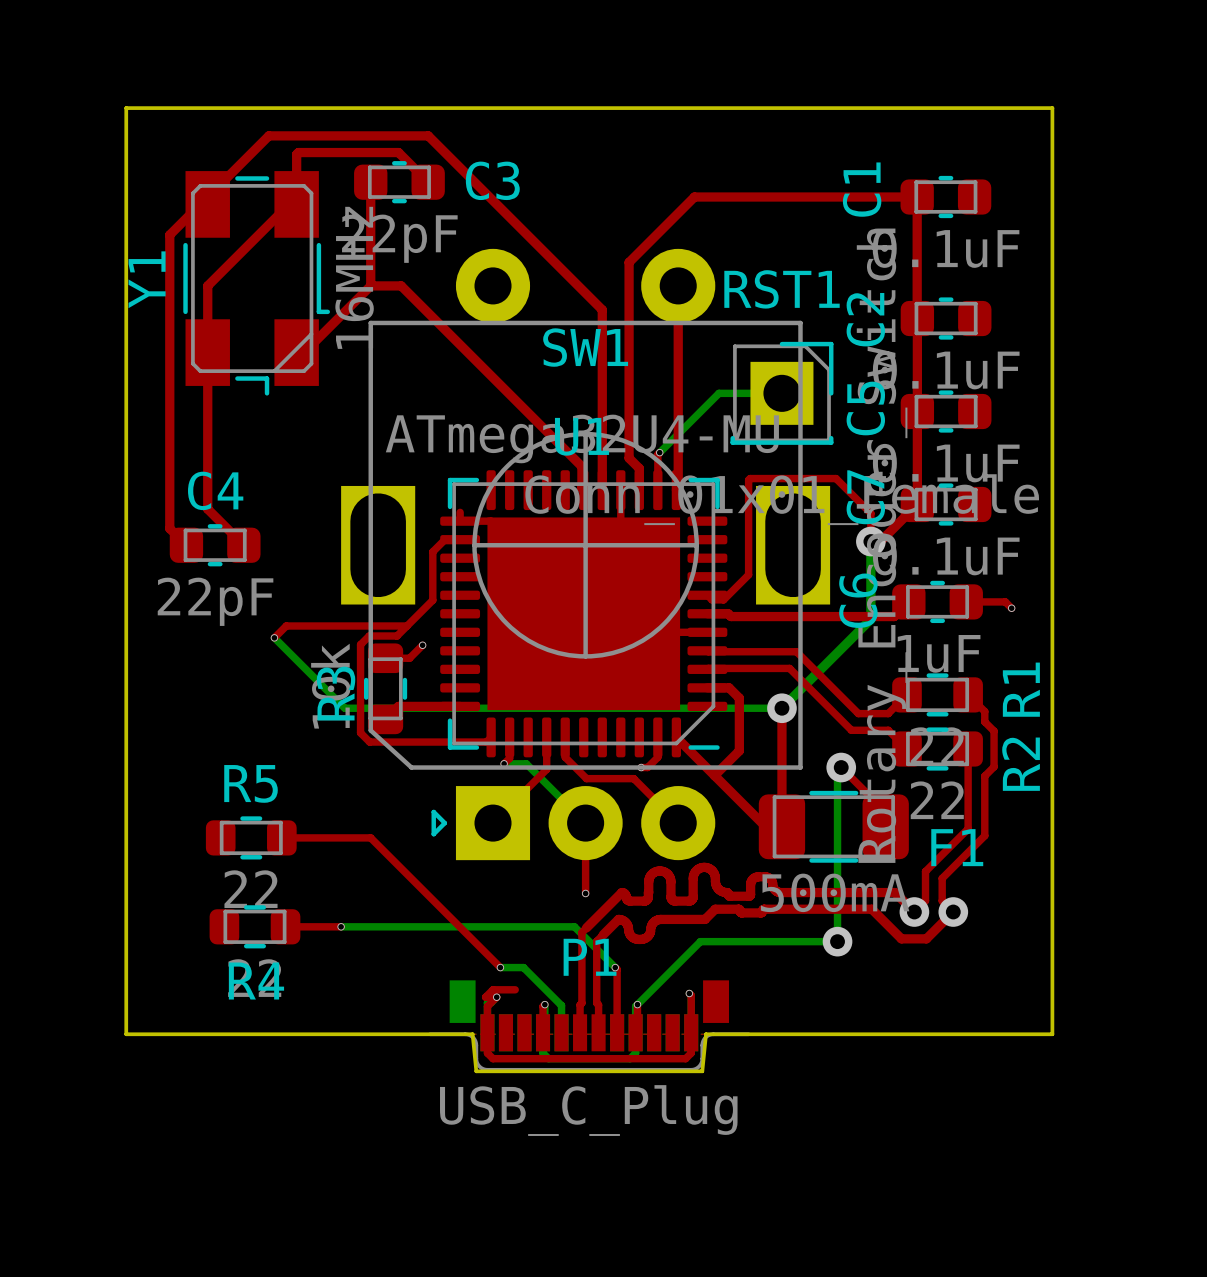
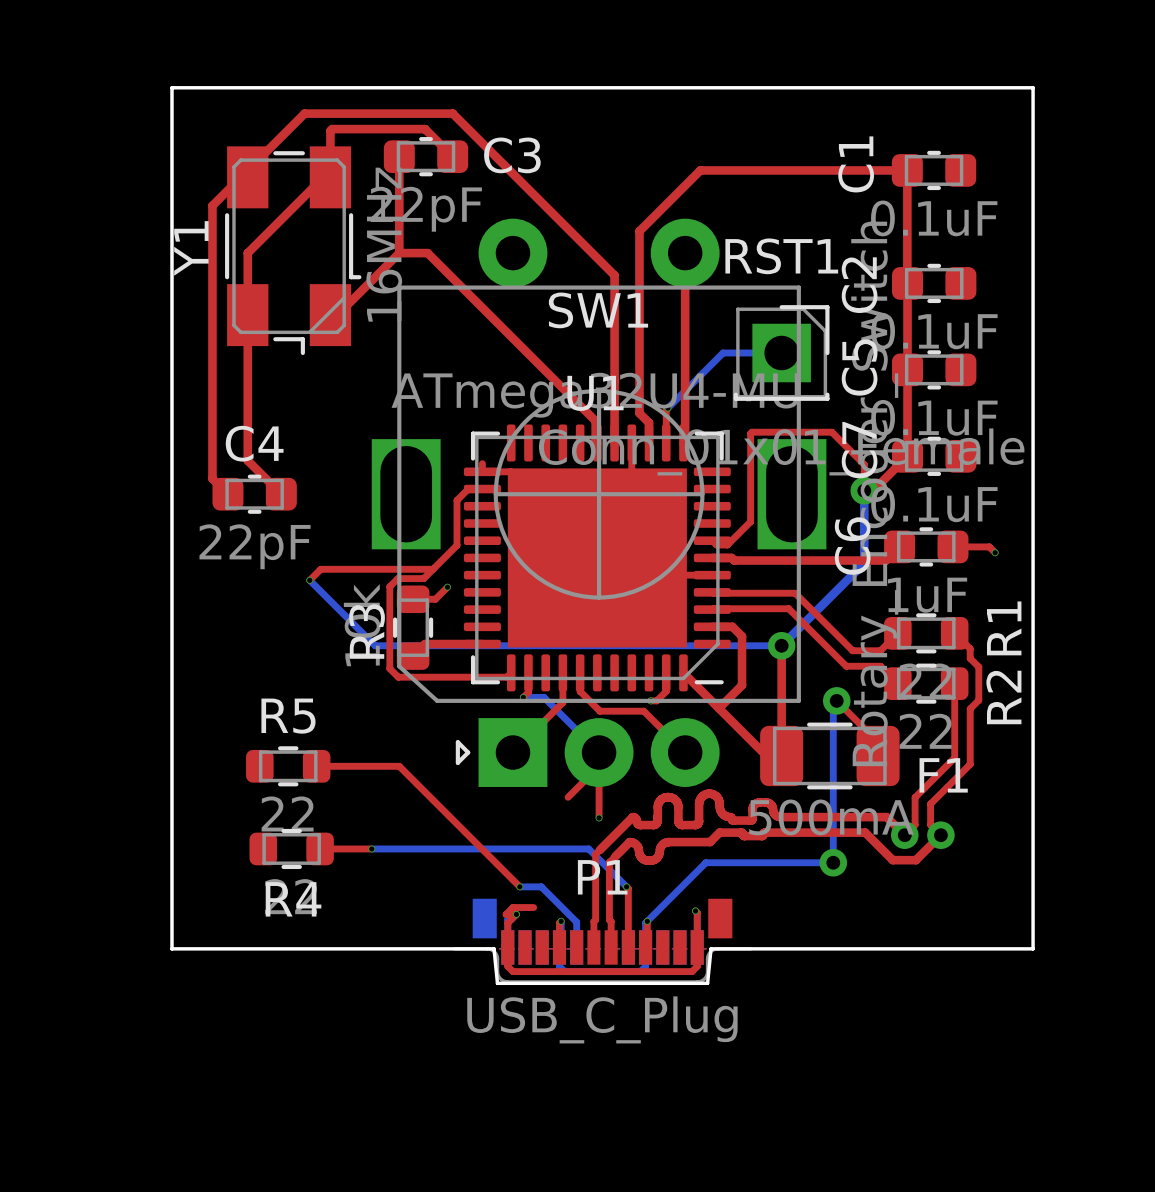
top track: none -> (599, 766) (568, 797)

